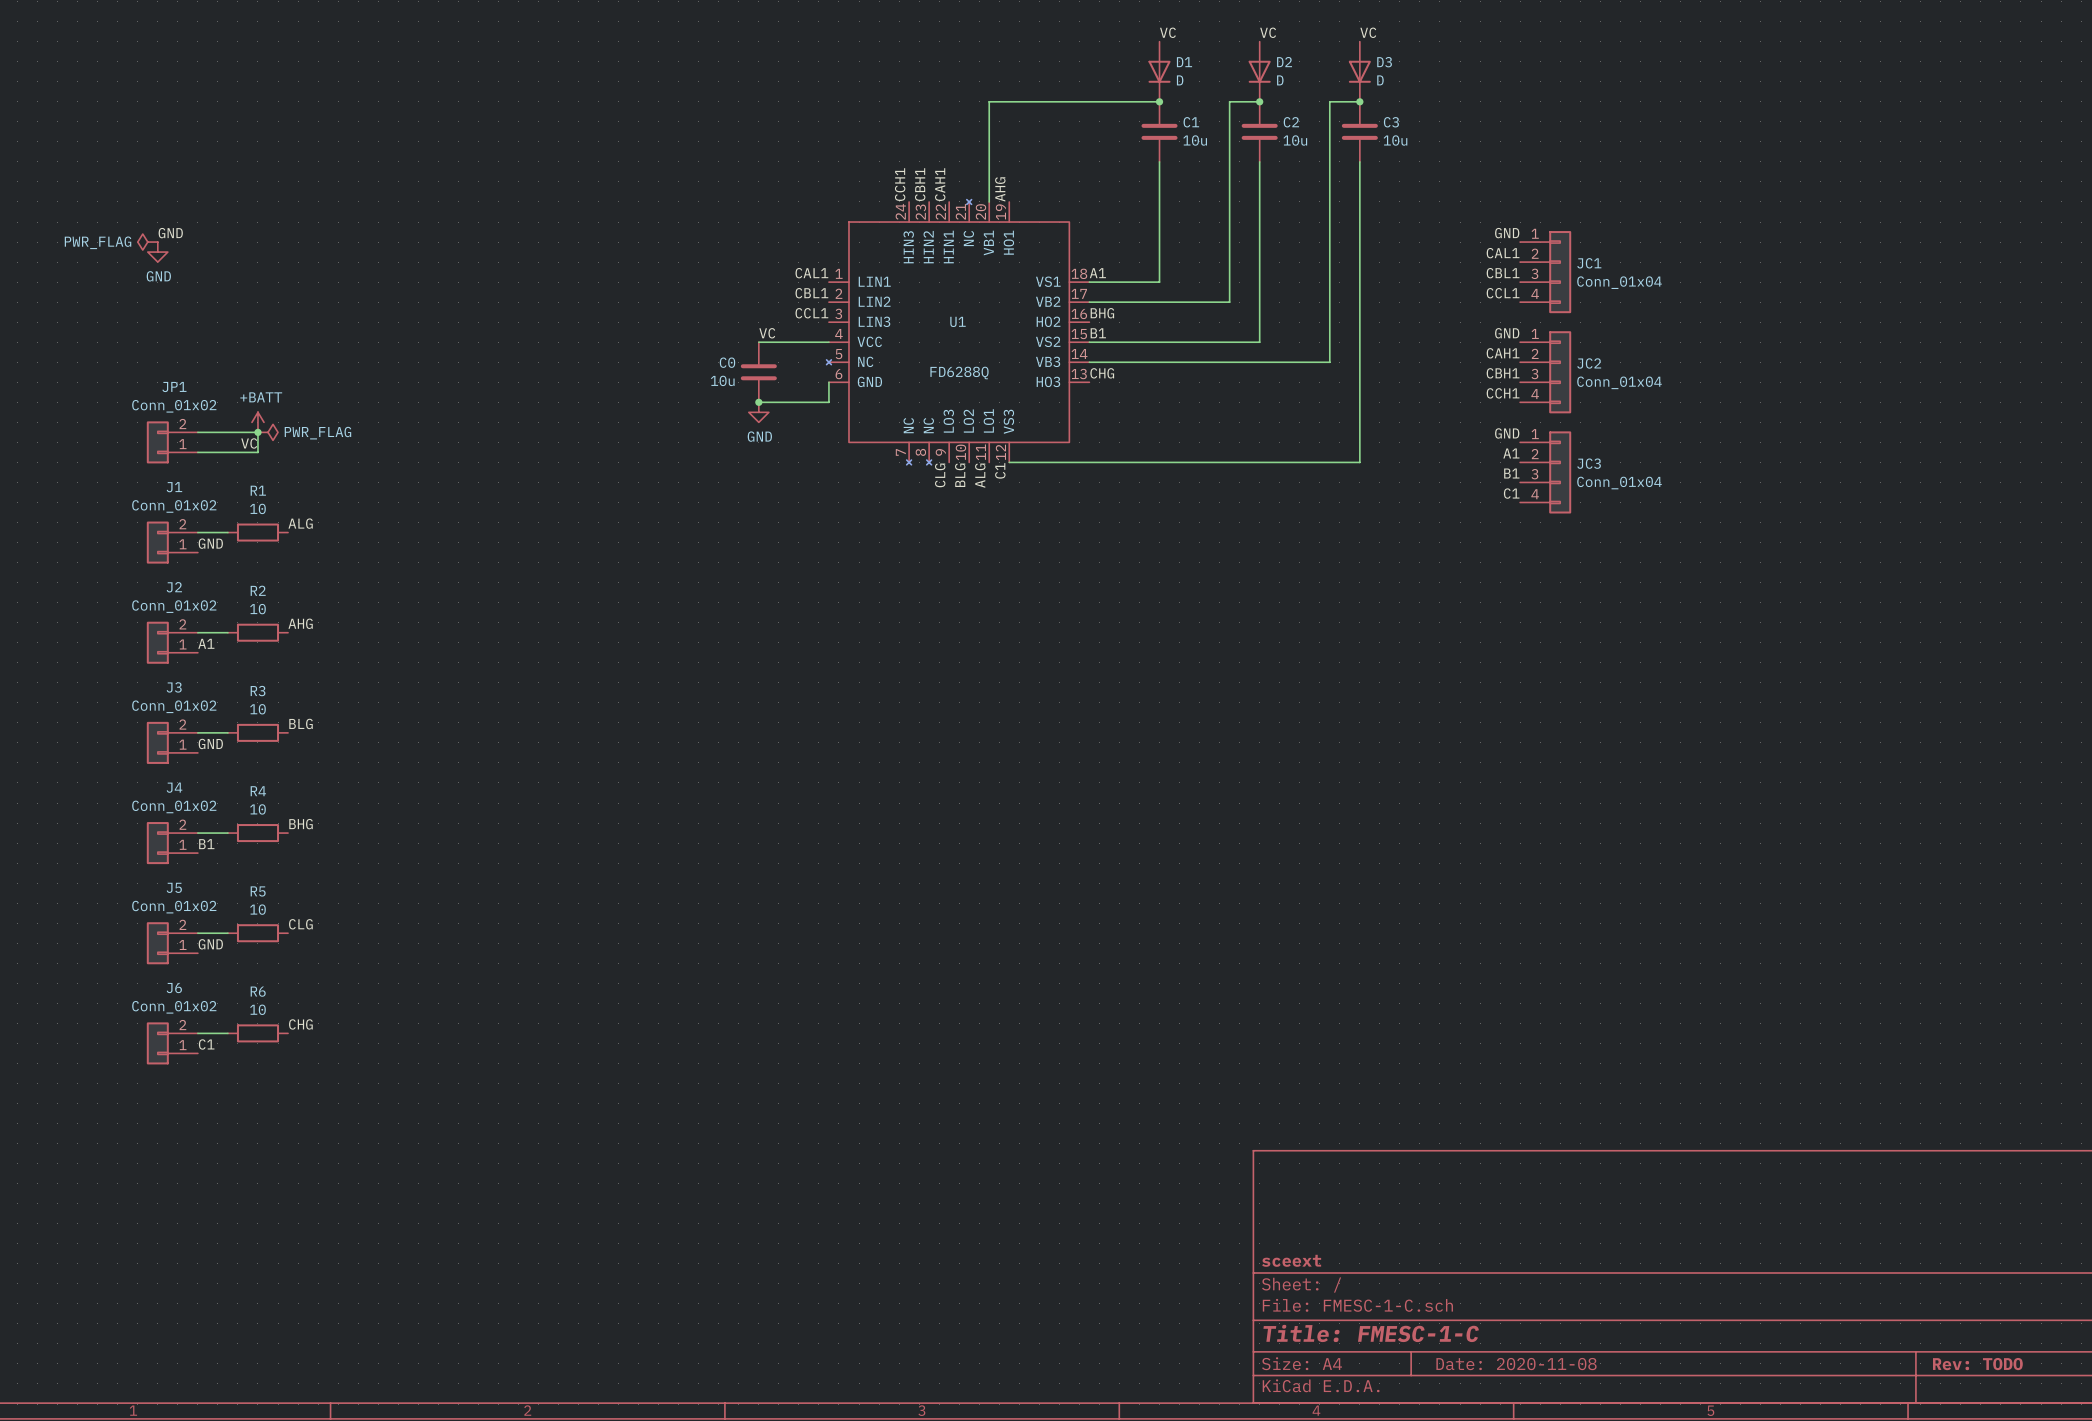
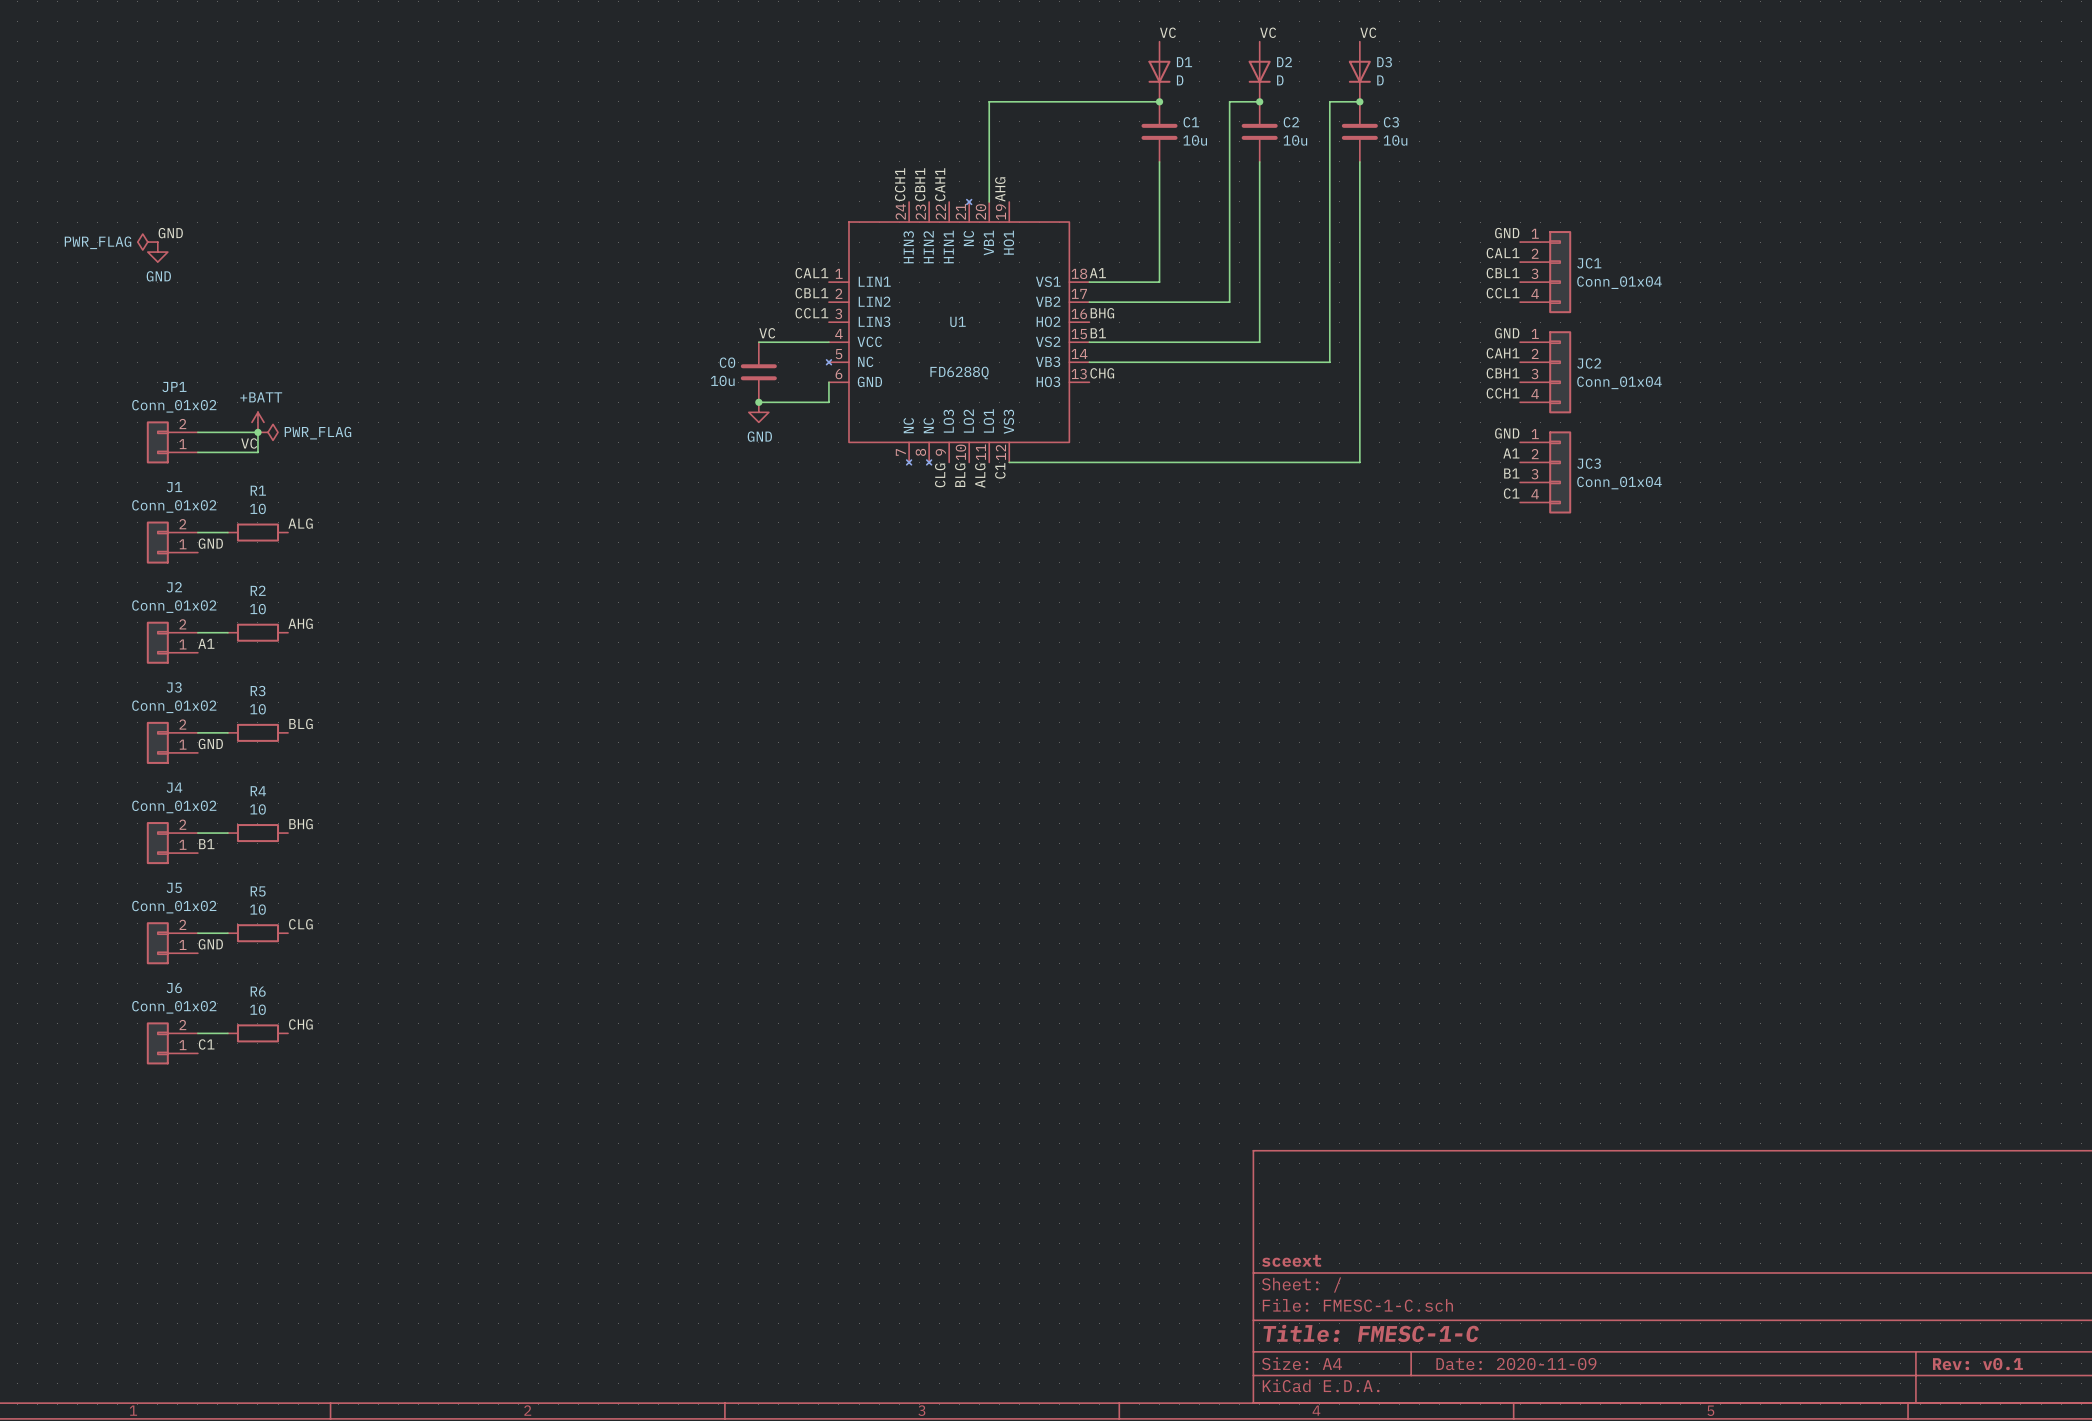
title block: Date: 2020-11-08 (1516, 1364) -> Date: 2020-11-09 (1516, 1364)
title block: Rev: TODO (1977, 1364) -> Rev: v0.1 (1977, 1364)

